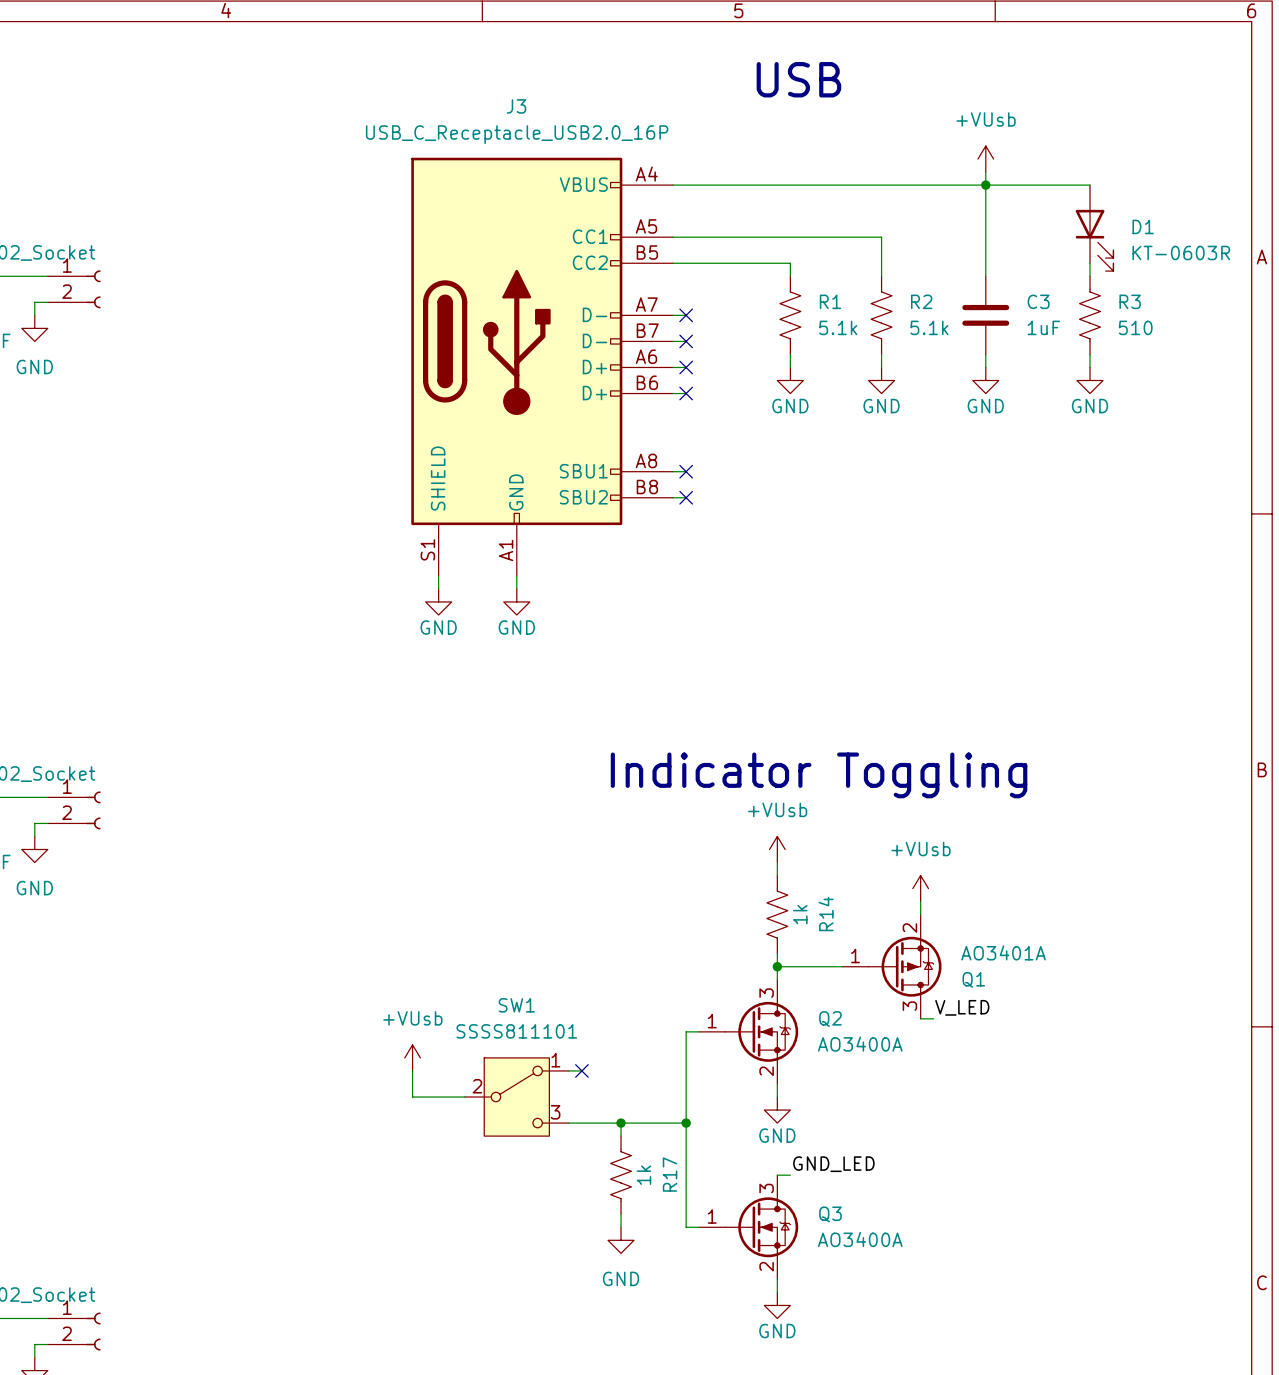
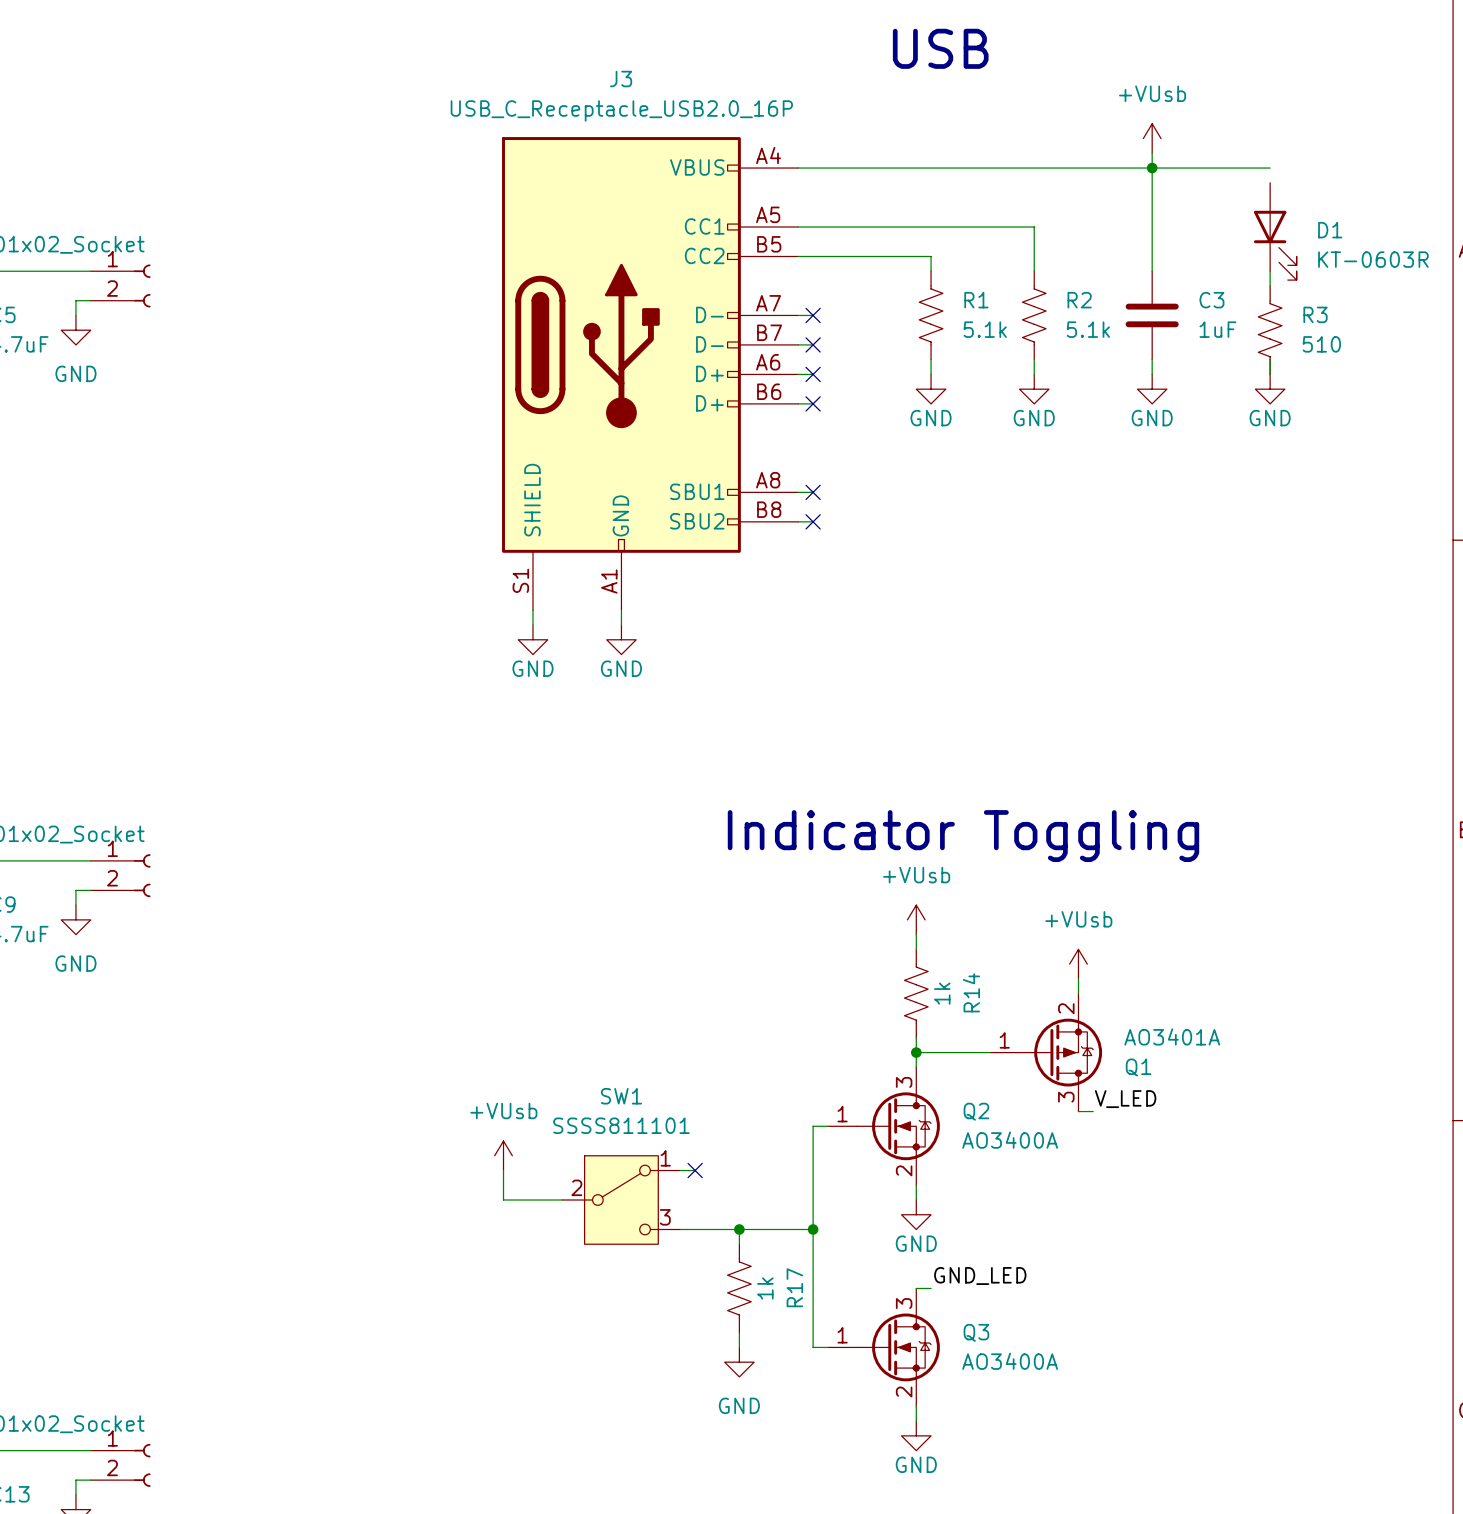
D1 position: (1094, 228) -> (1275, 231)
R3 position: (1090, 315) -> (1270, 330)

